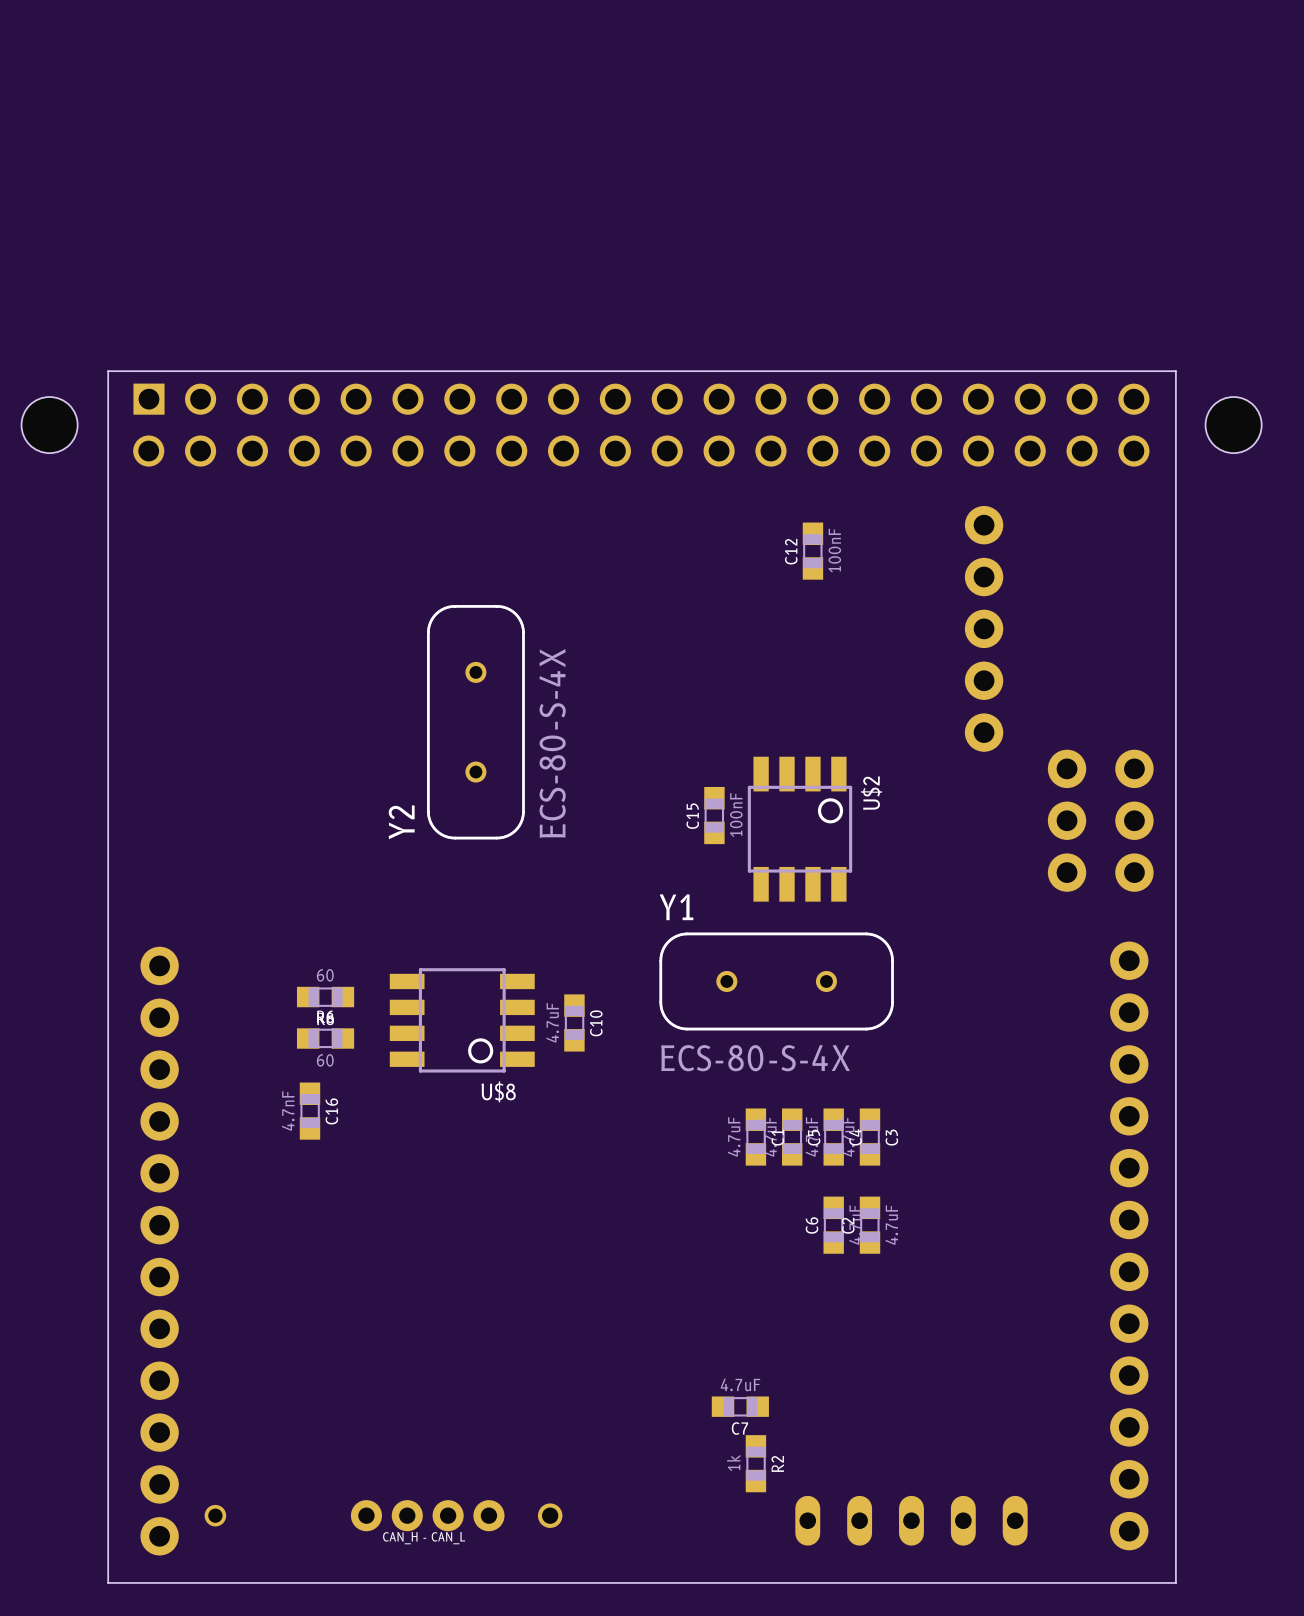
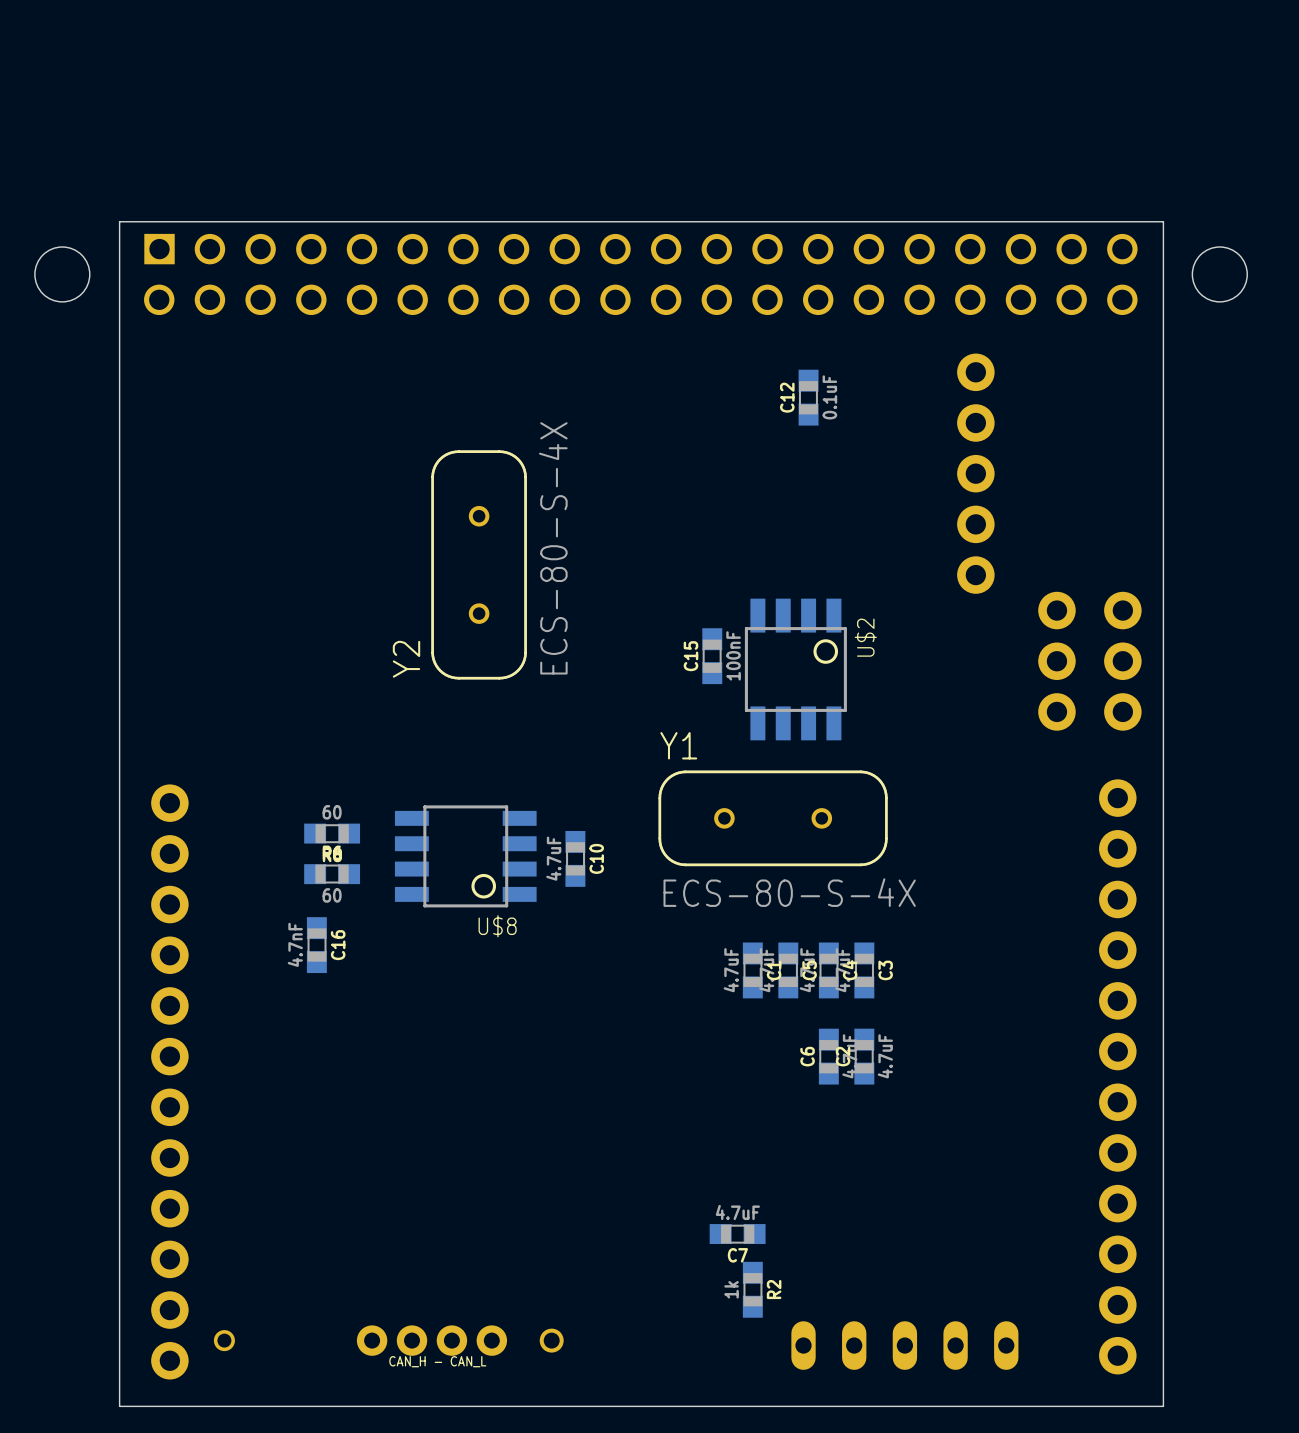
C12 value: 100nF (834, 550) -> 0.1uF (829, 397)

